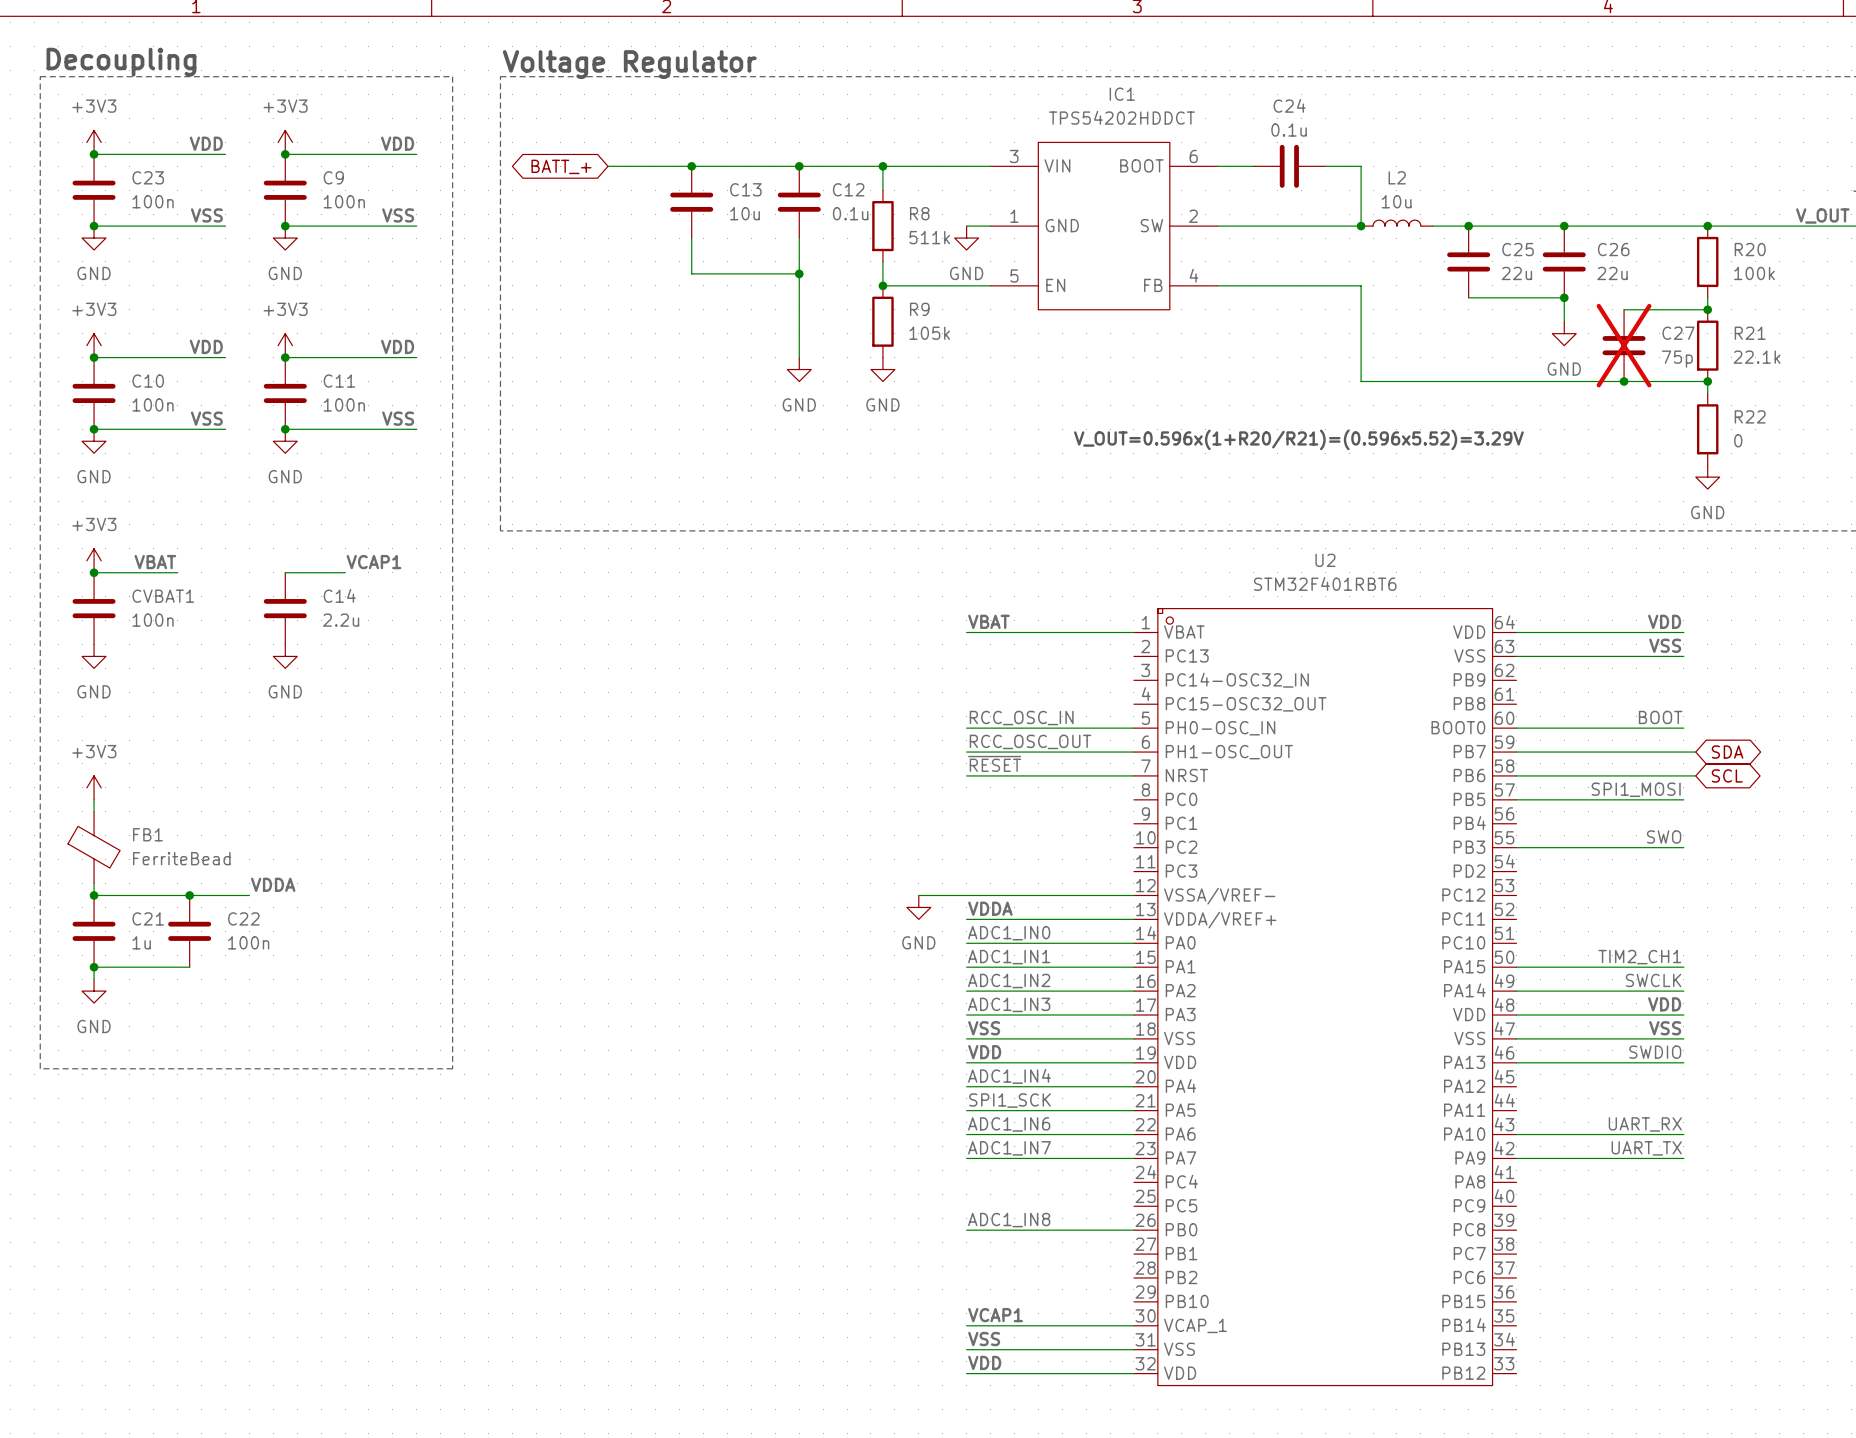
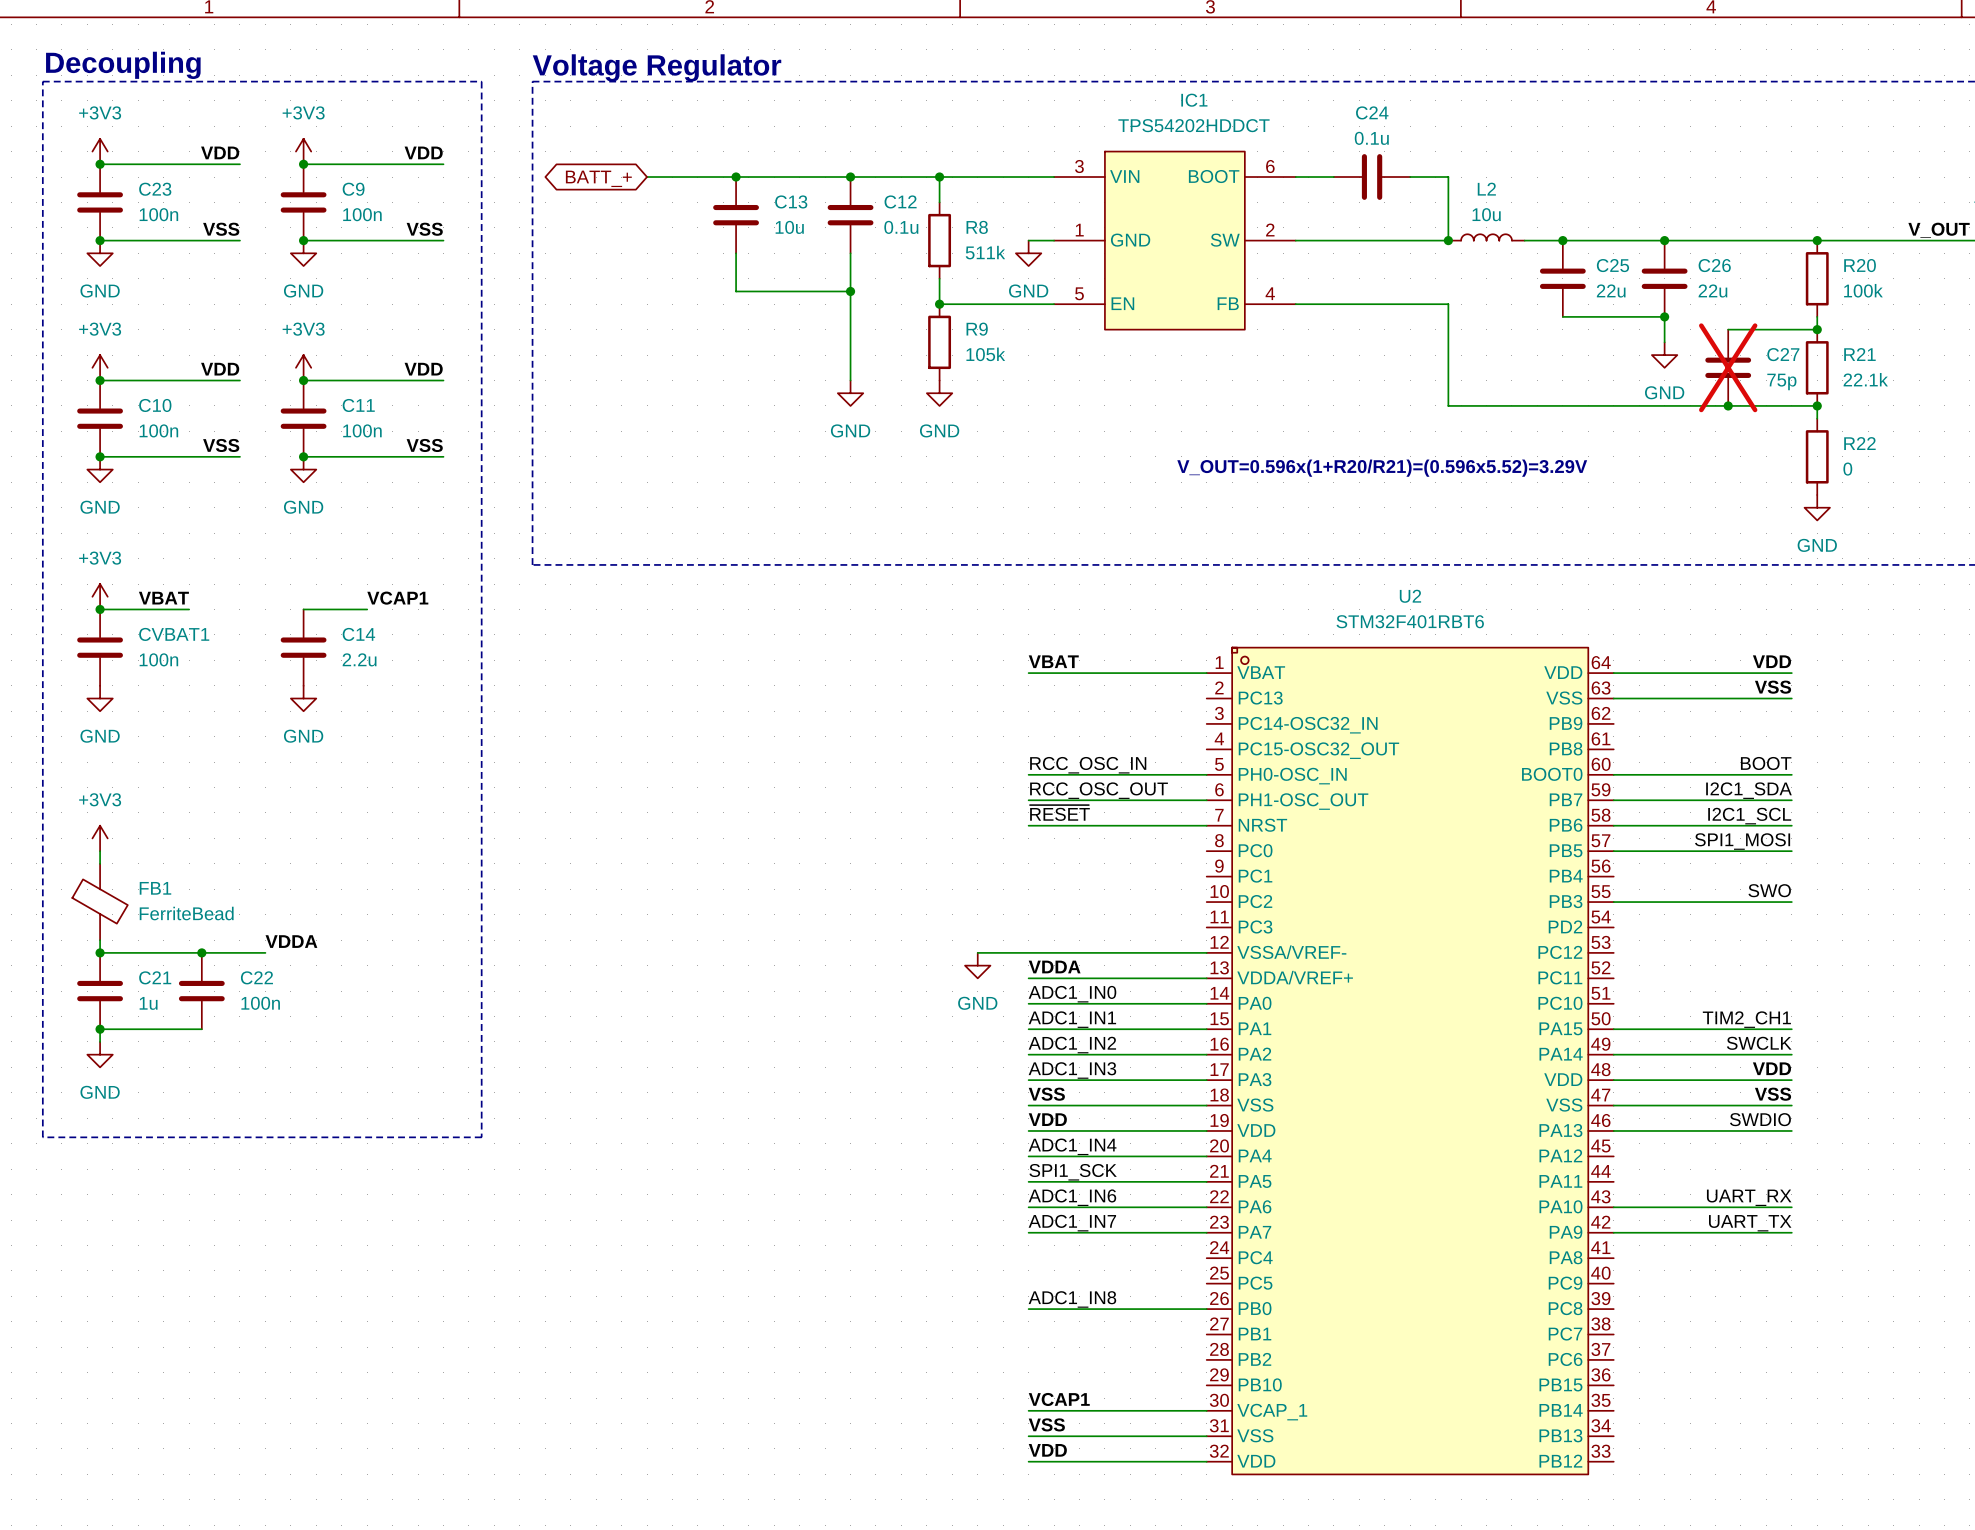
label: none -> I2C1_SDA (1748, 790)
wire: (1683, 752) (1695, 752) -> none
global label: SDA (1727, 752) -> none
label: none -> I2C1_SCL (1749, 816)
wire: (1683, 775) (1695, 775) -> none
global label: SCL (1727, 775) -> none

